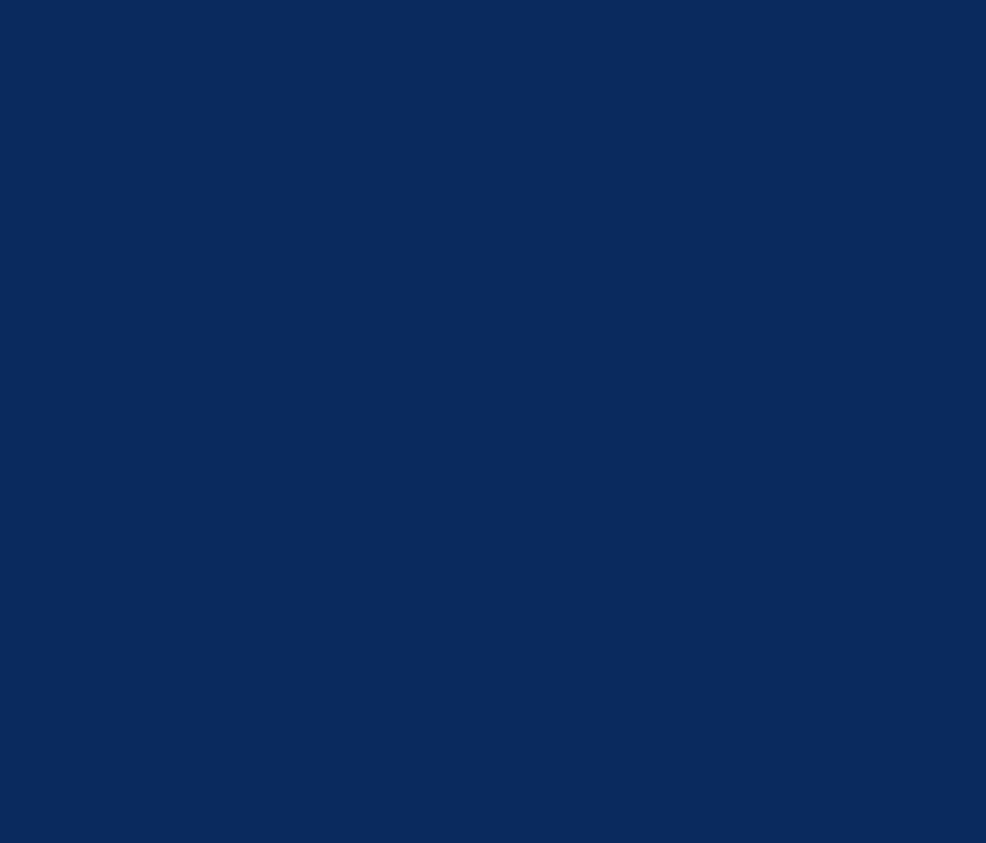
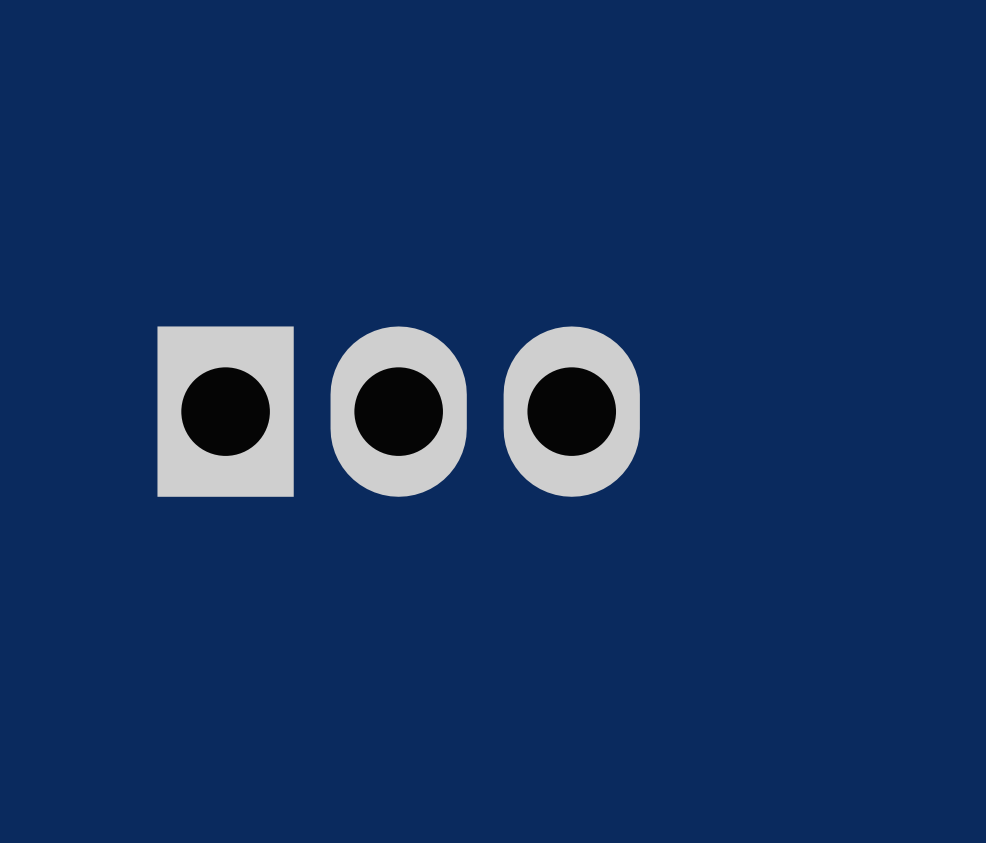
part: none -> (398, 411)

